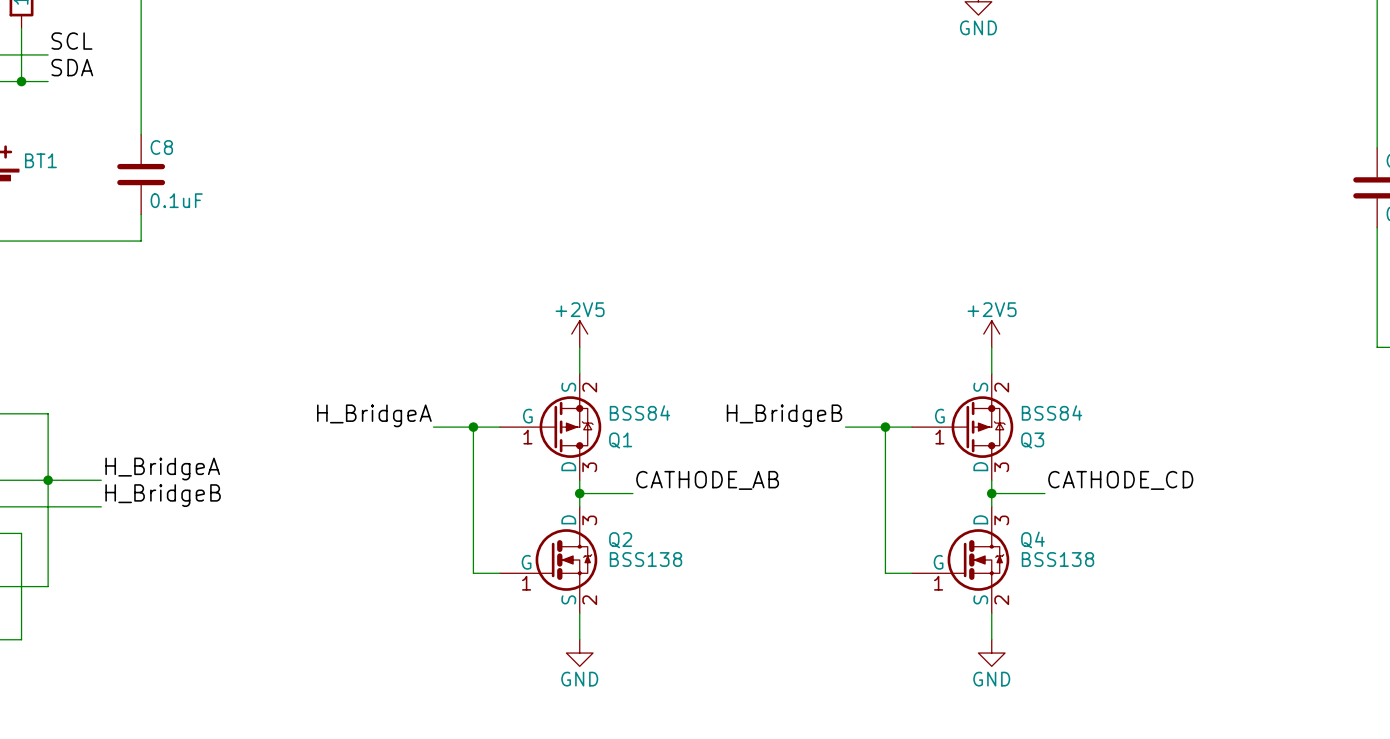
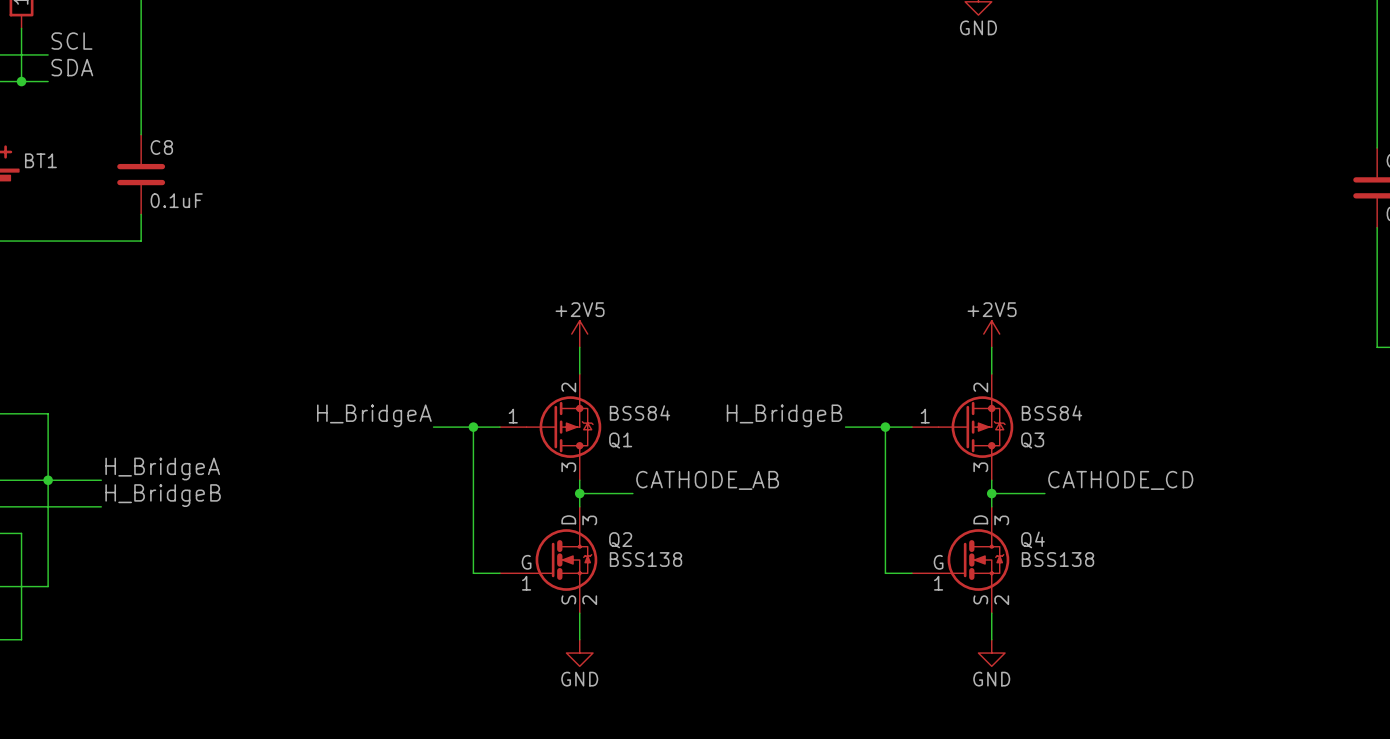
Q1 symbol: [499, 373, 602, 481] -> [499, 373, 602, 481]
Q3 symbol: [912, 373, 1014, 481] -> [912, 373, 1014, 481]

